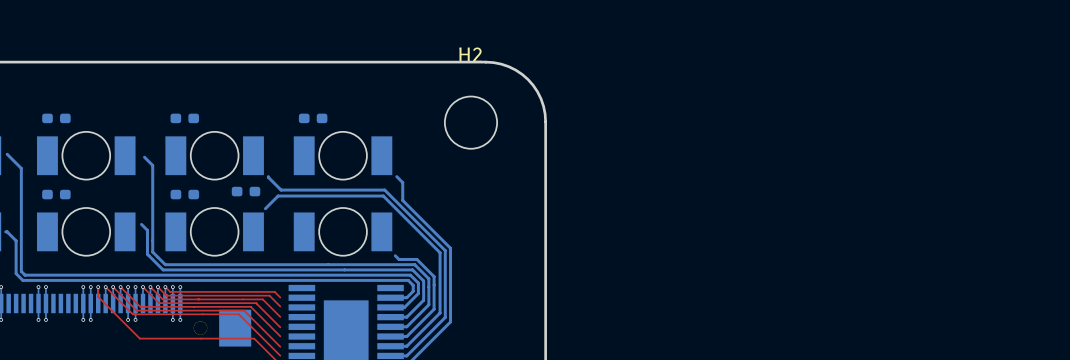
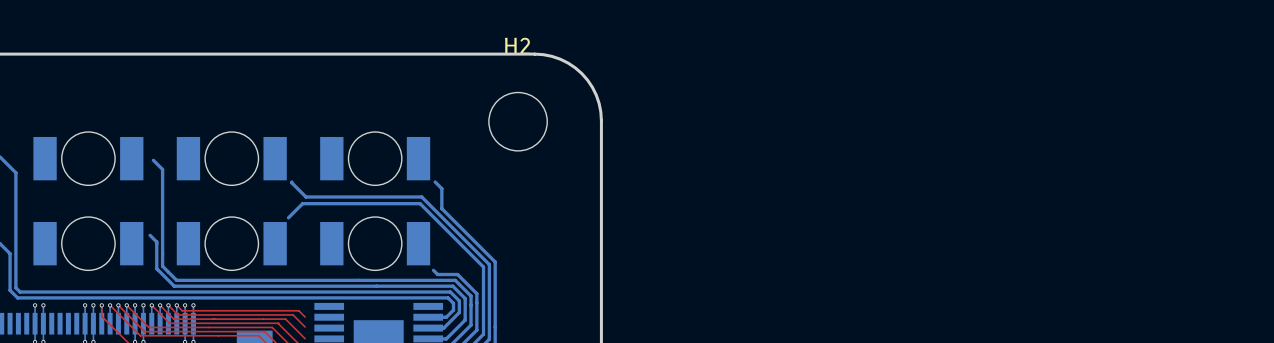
part: (56, 118) -> none
part: (184, 118) -> none
part: (313, 118) -> none
part: (246, 191) -> none
part: (56, 194) -> none
part: (184, 194) -> none

